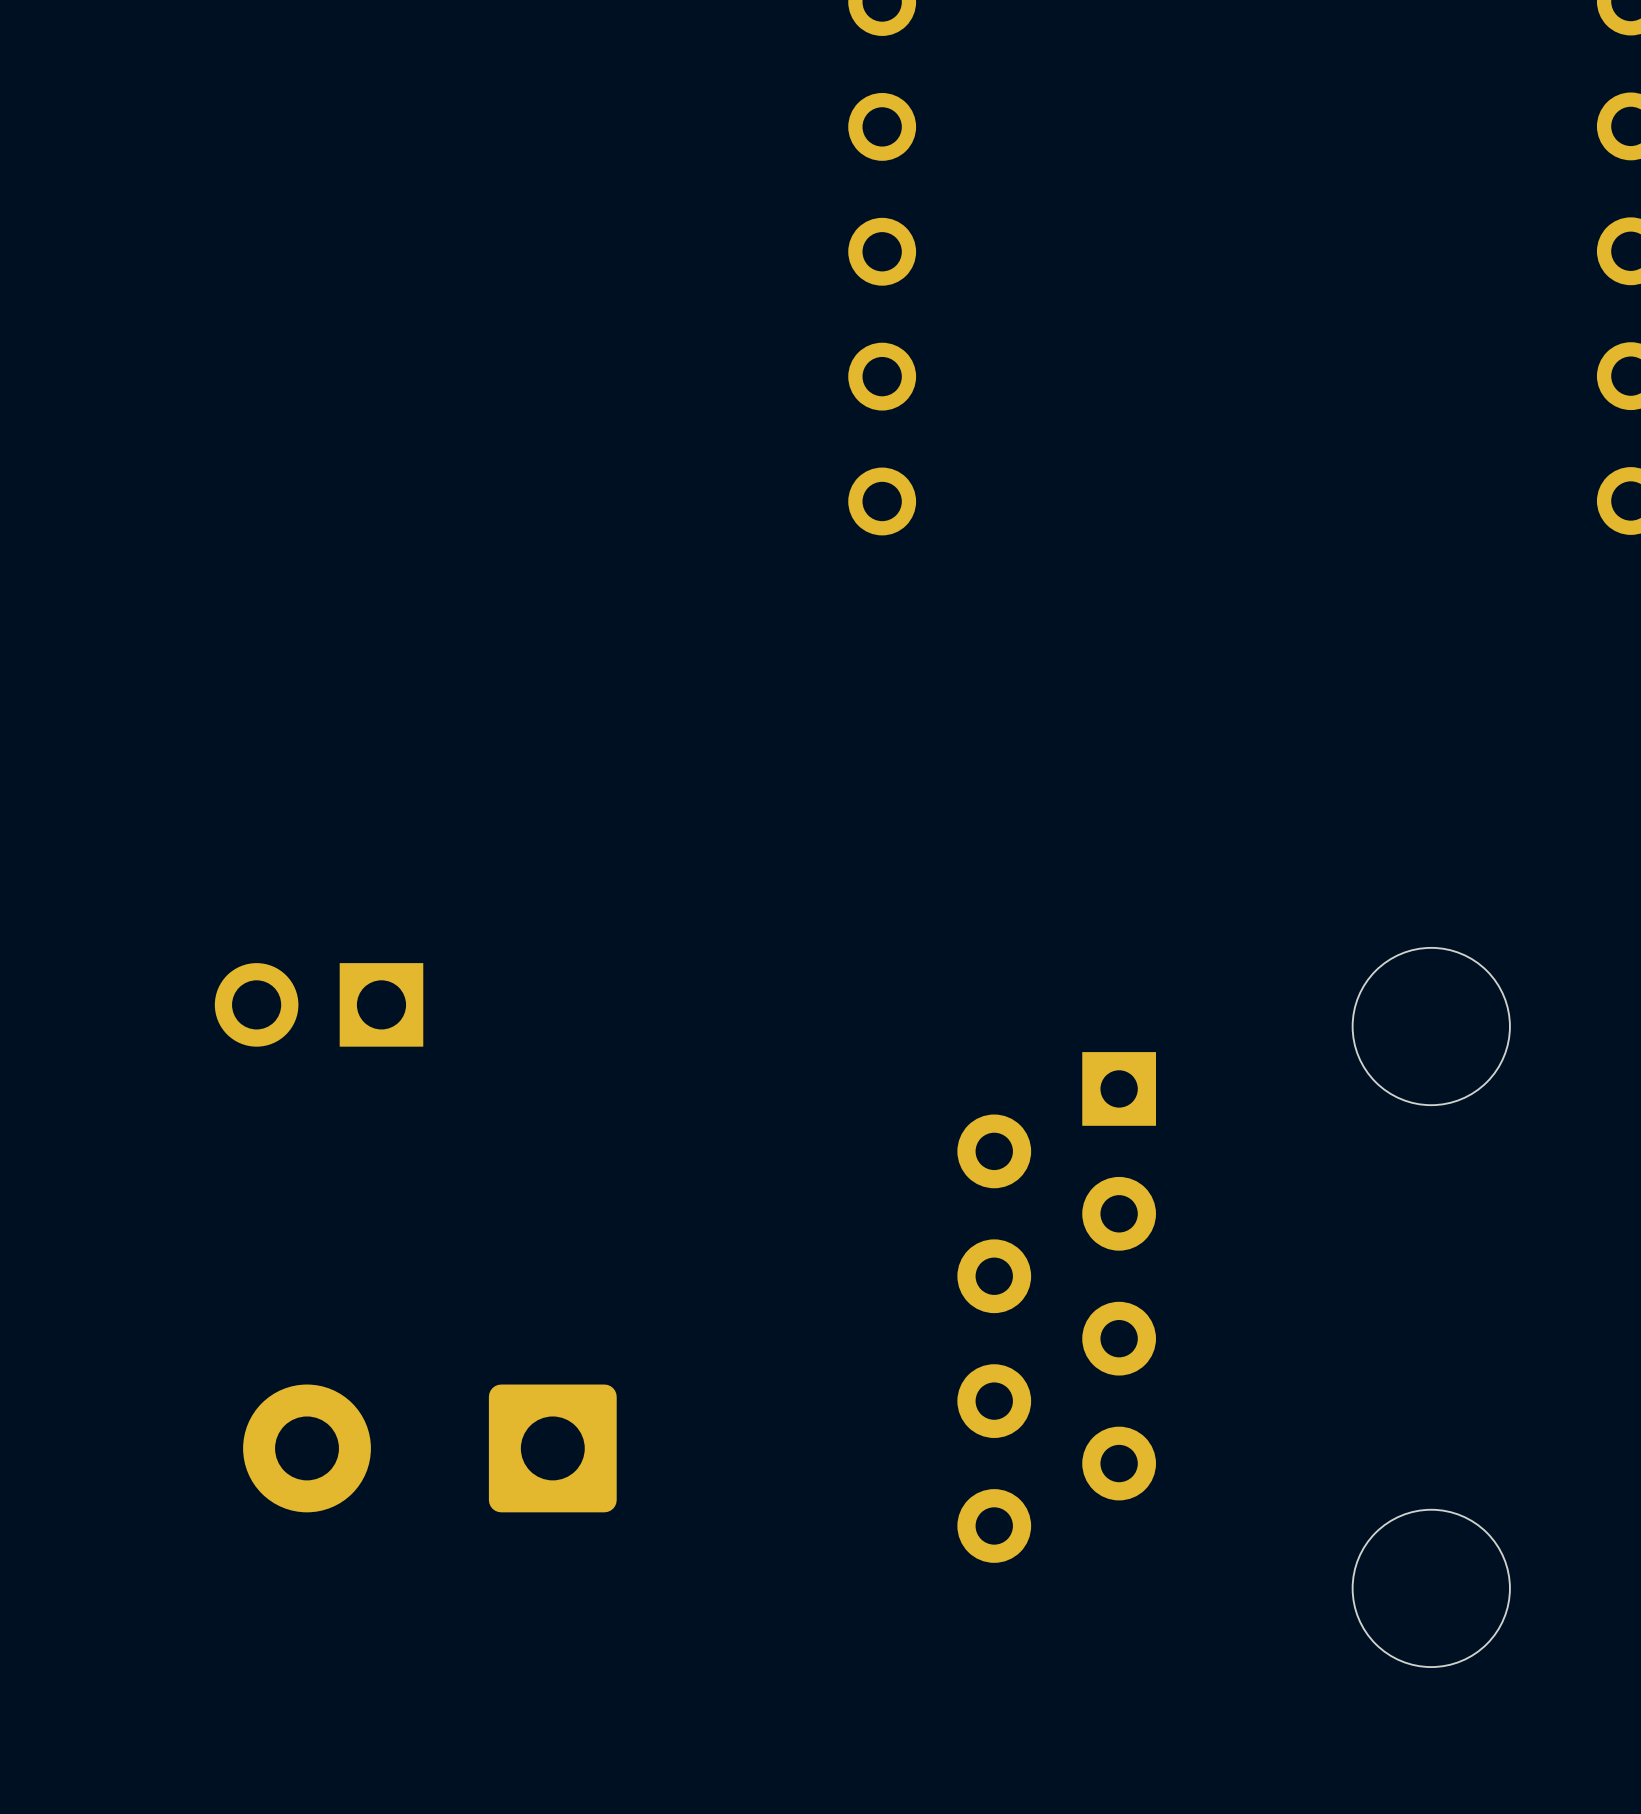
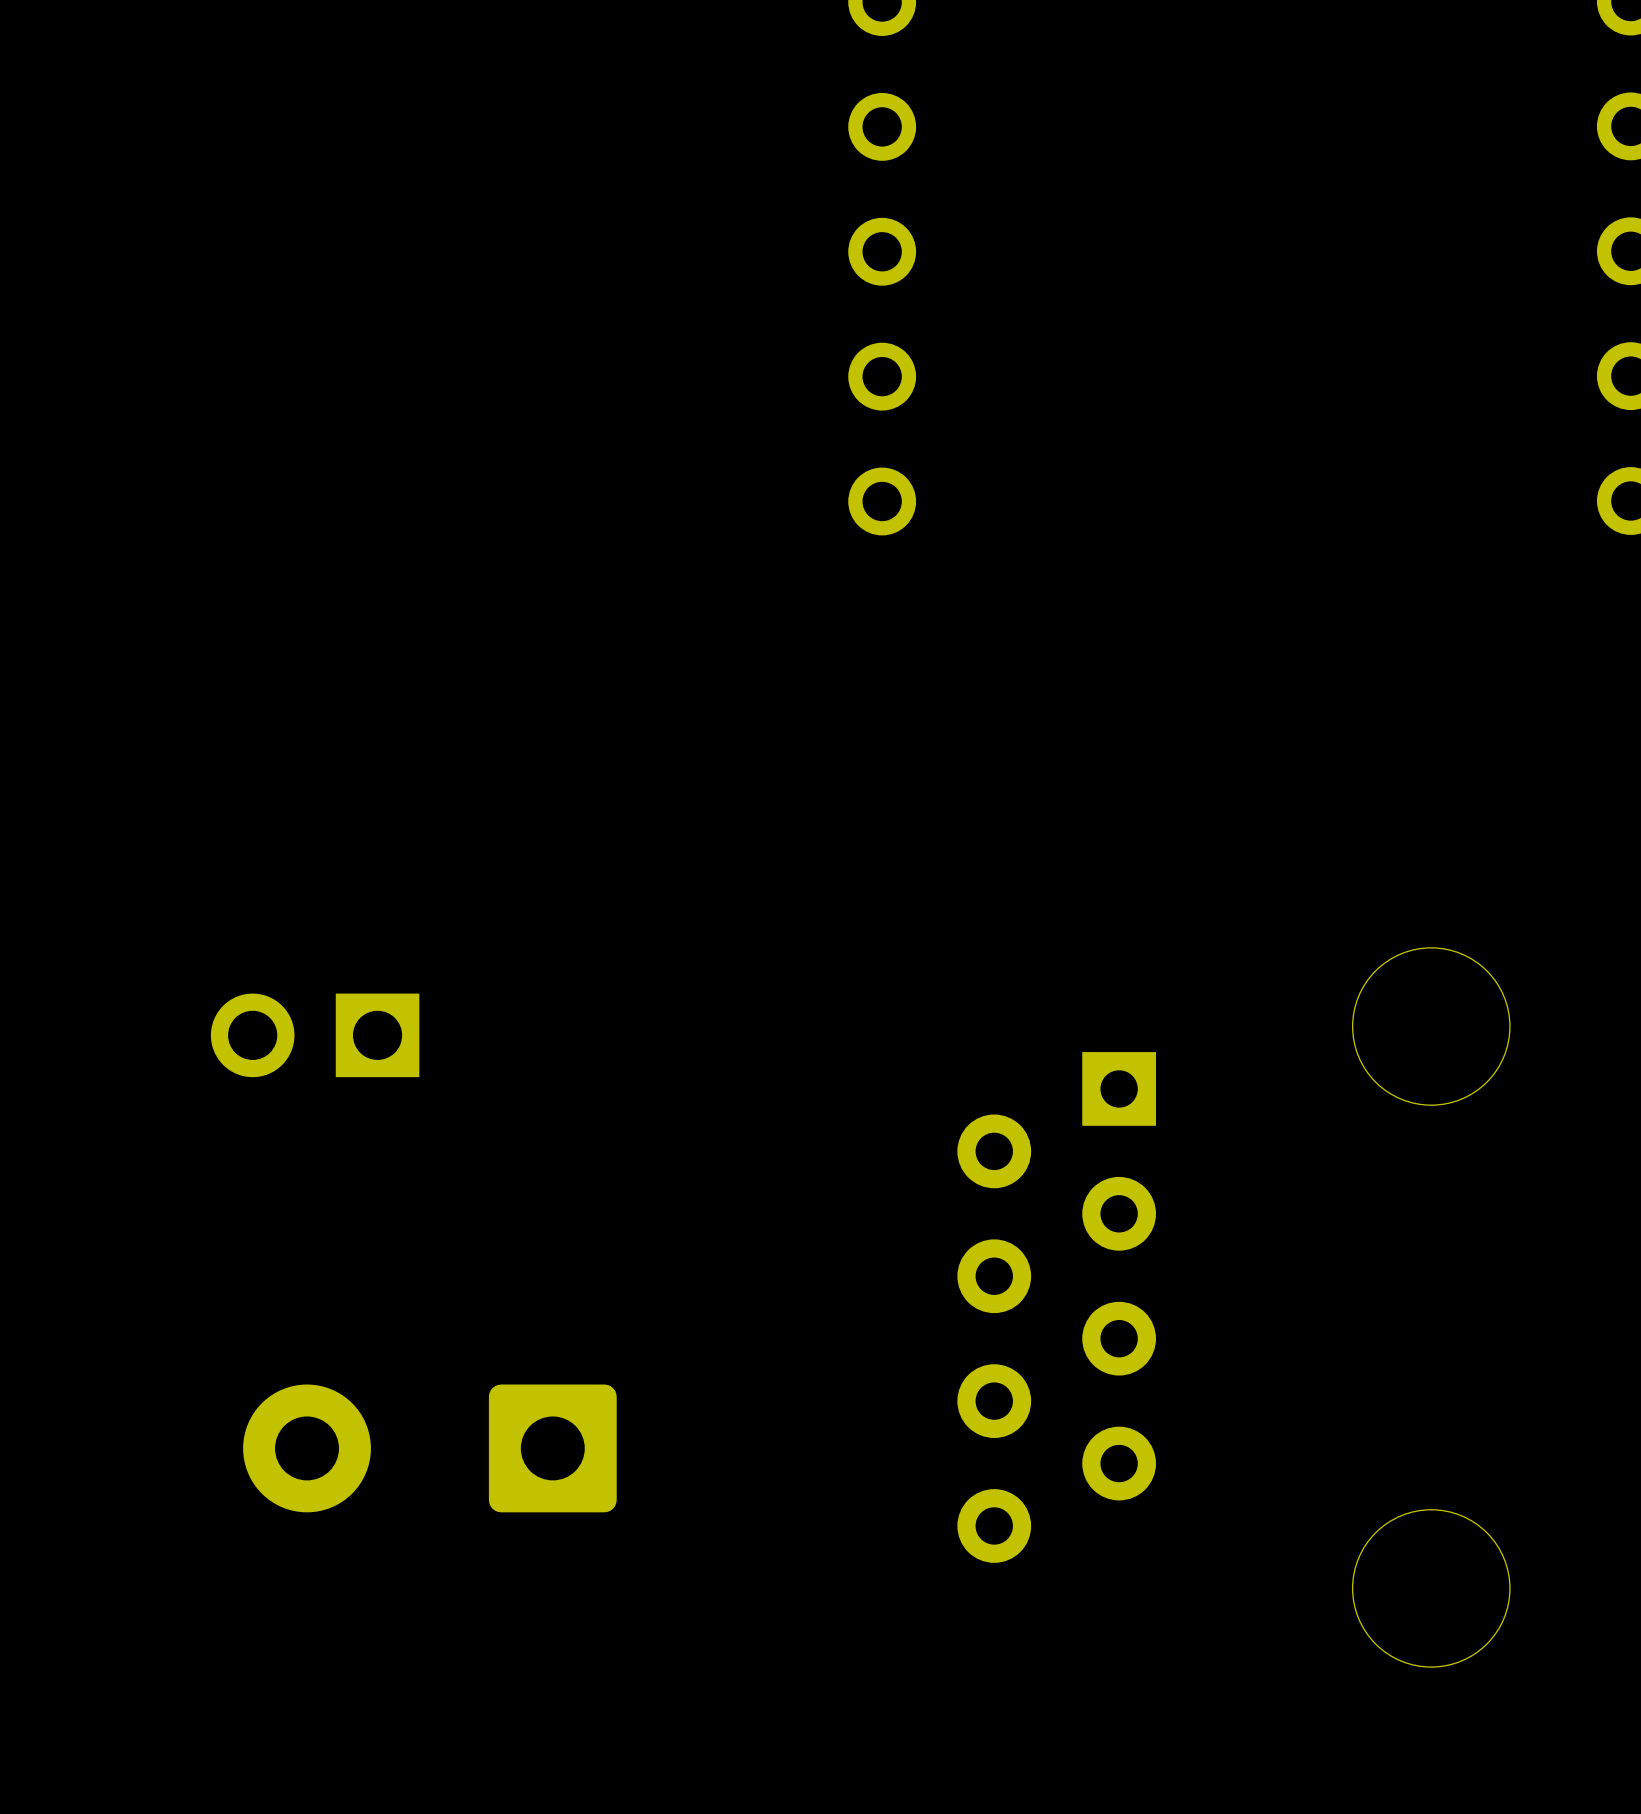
part position: (319, 1004) -> (315, 1035)

